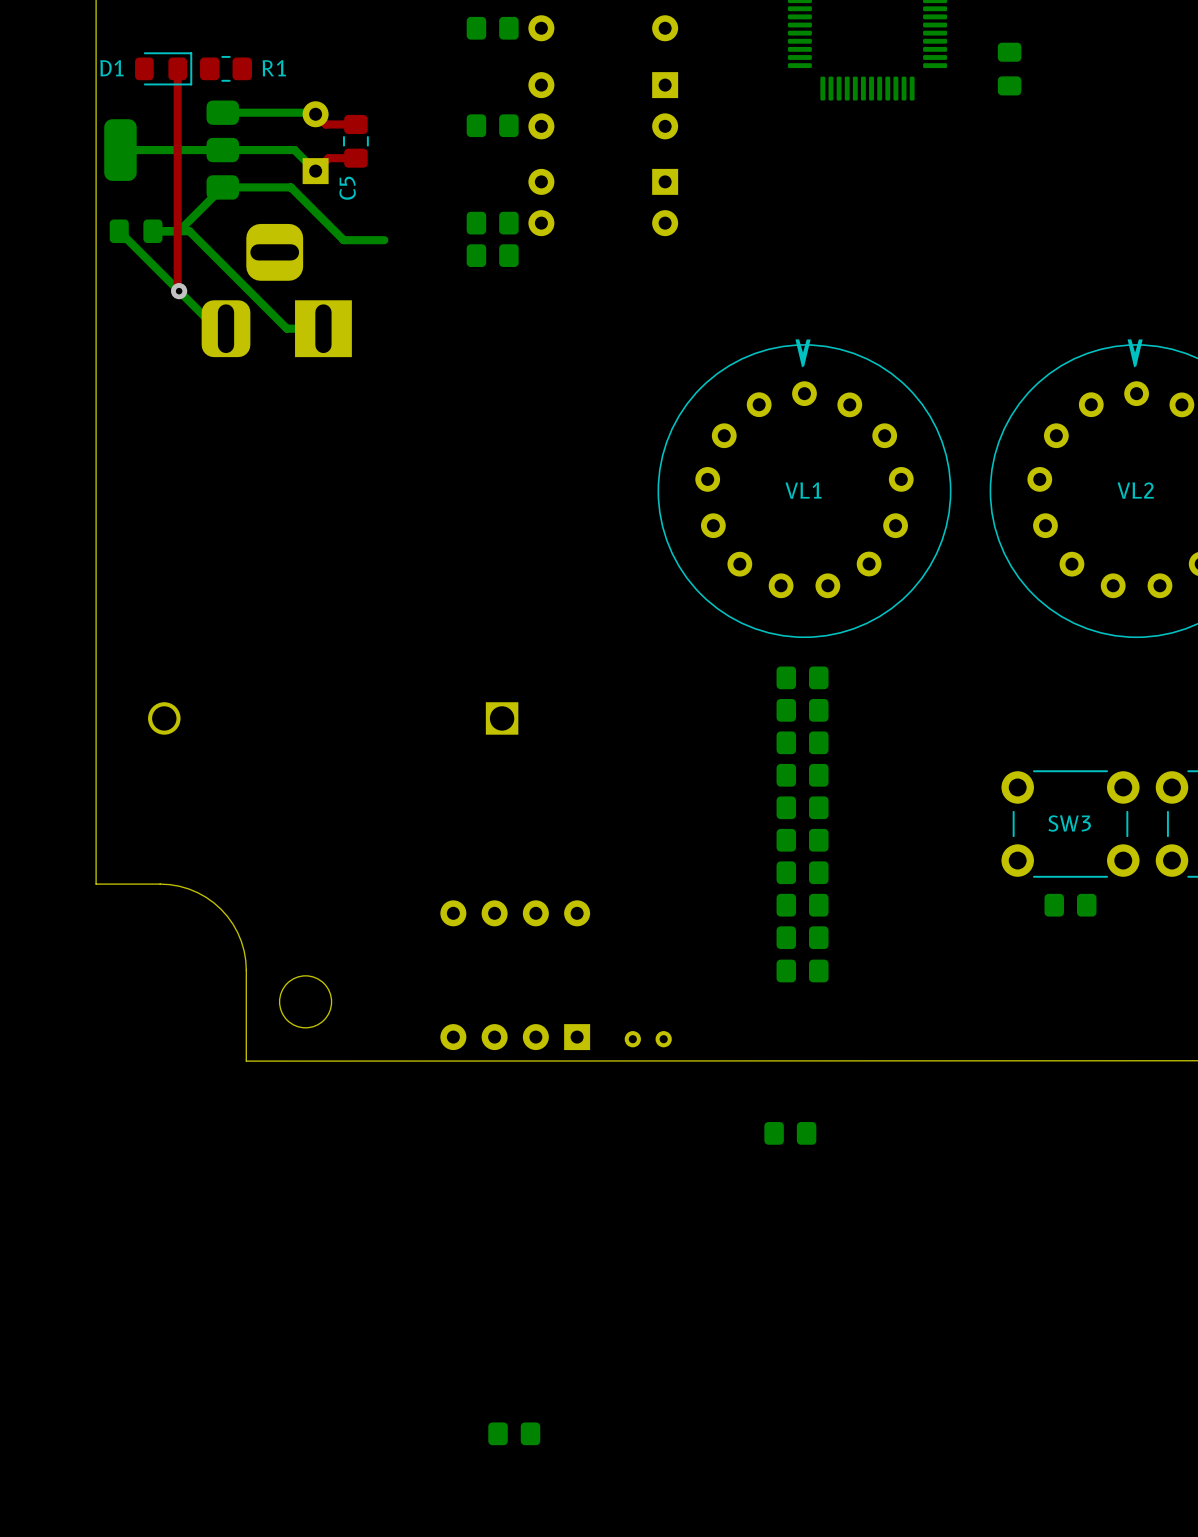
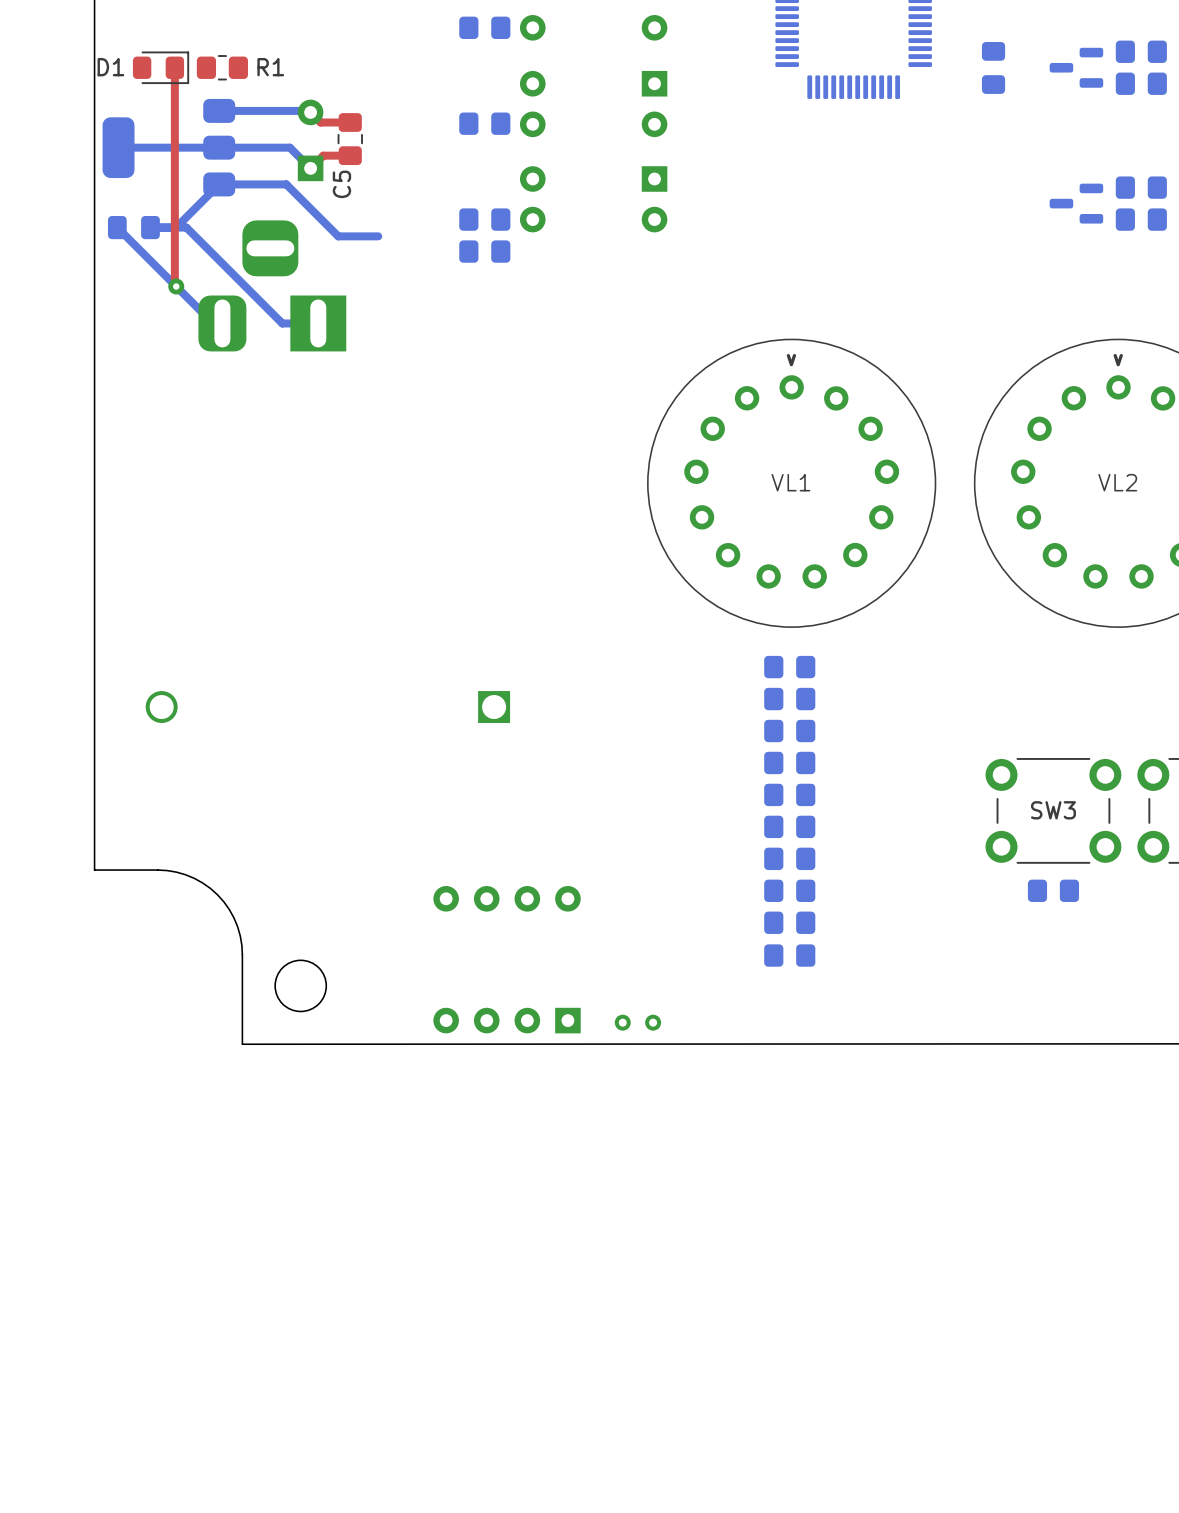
part: none -> (1141, 51)
part: none -> (1076, 67)
part: none -> (1141, 83)
part: none -> (1141, 187)
part: none -> (1076, 203)
part: none -> (1141, 219)
part: (790, 1133) -> none
part: (514, 1433) -> none

